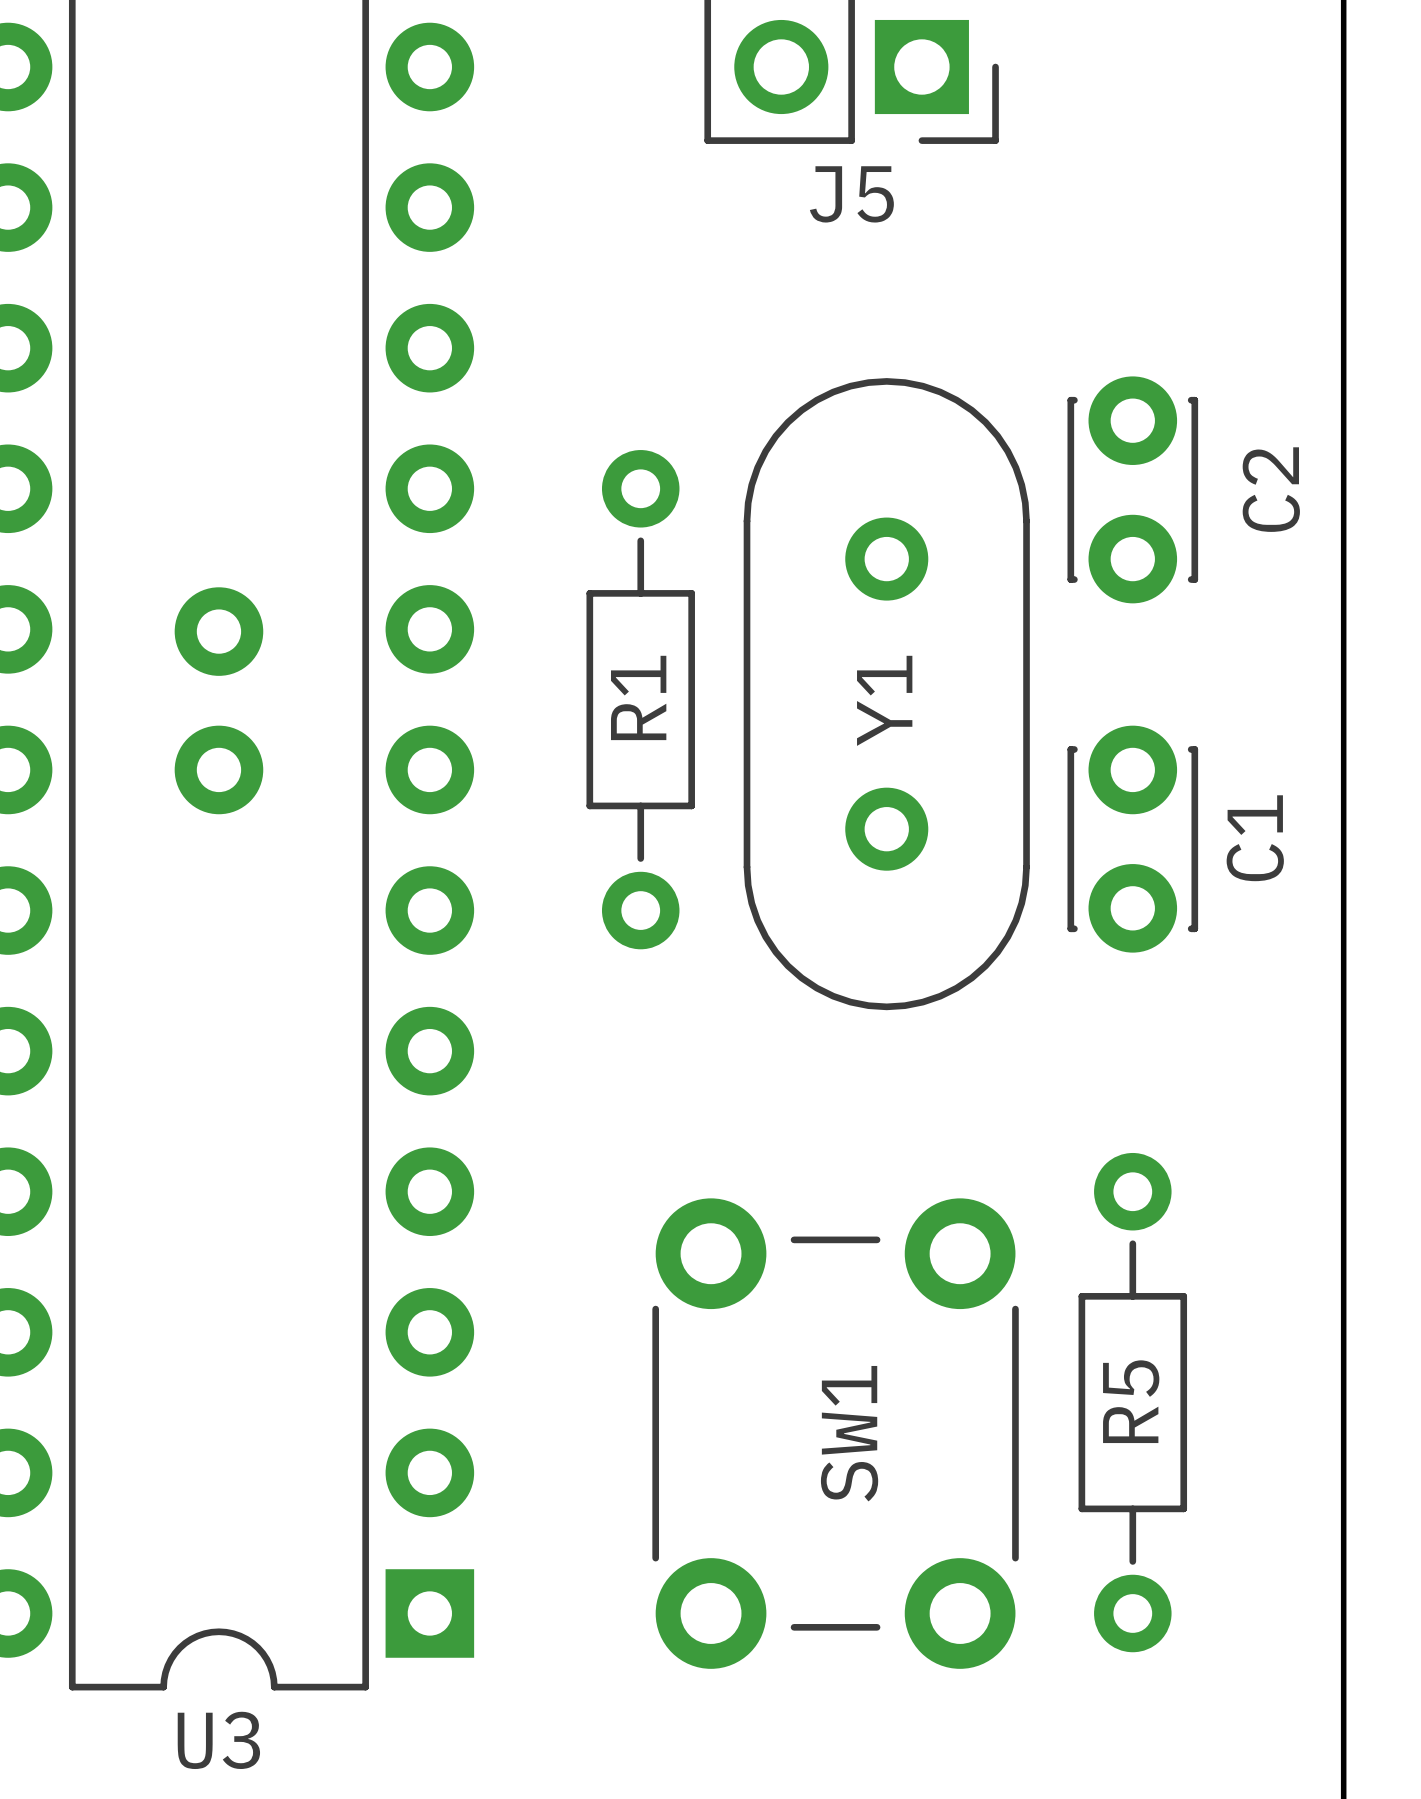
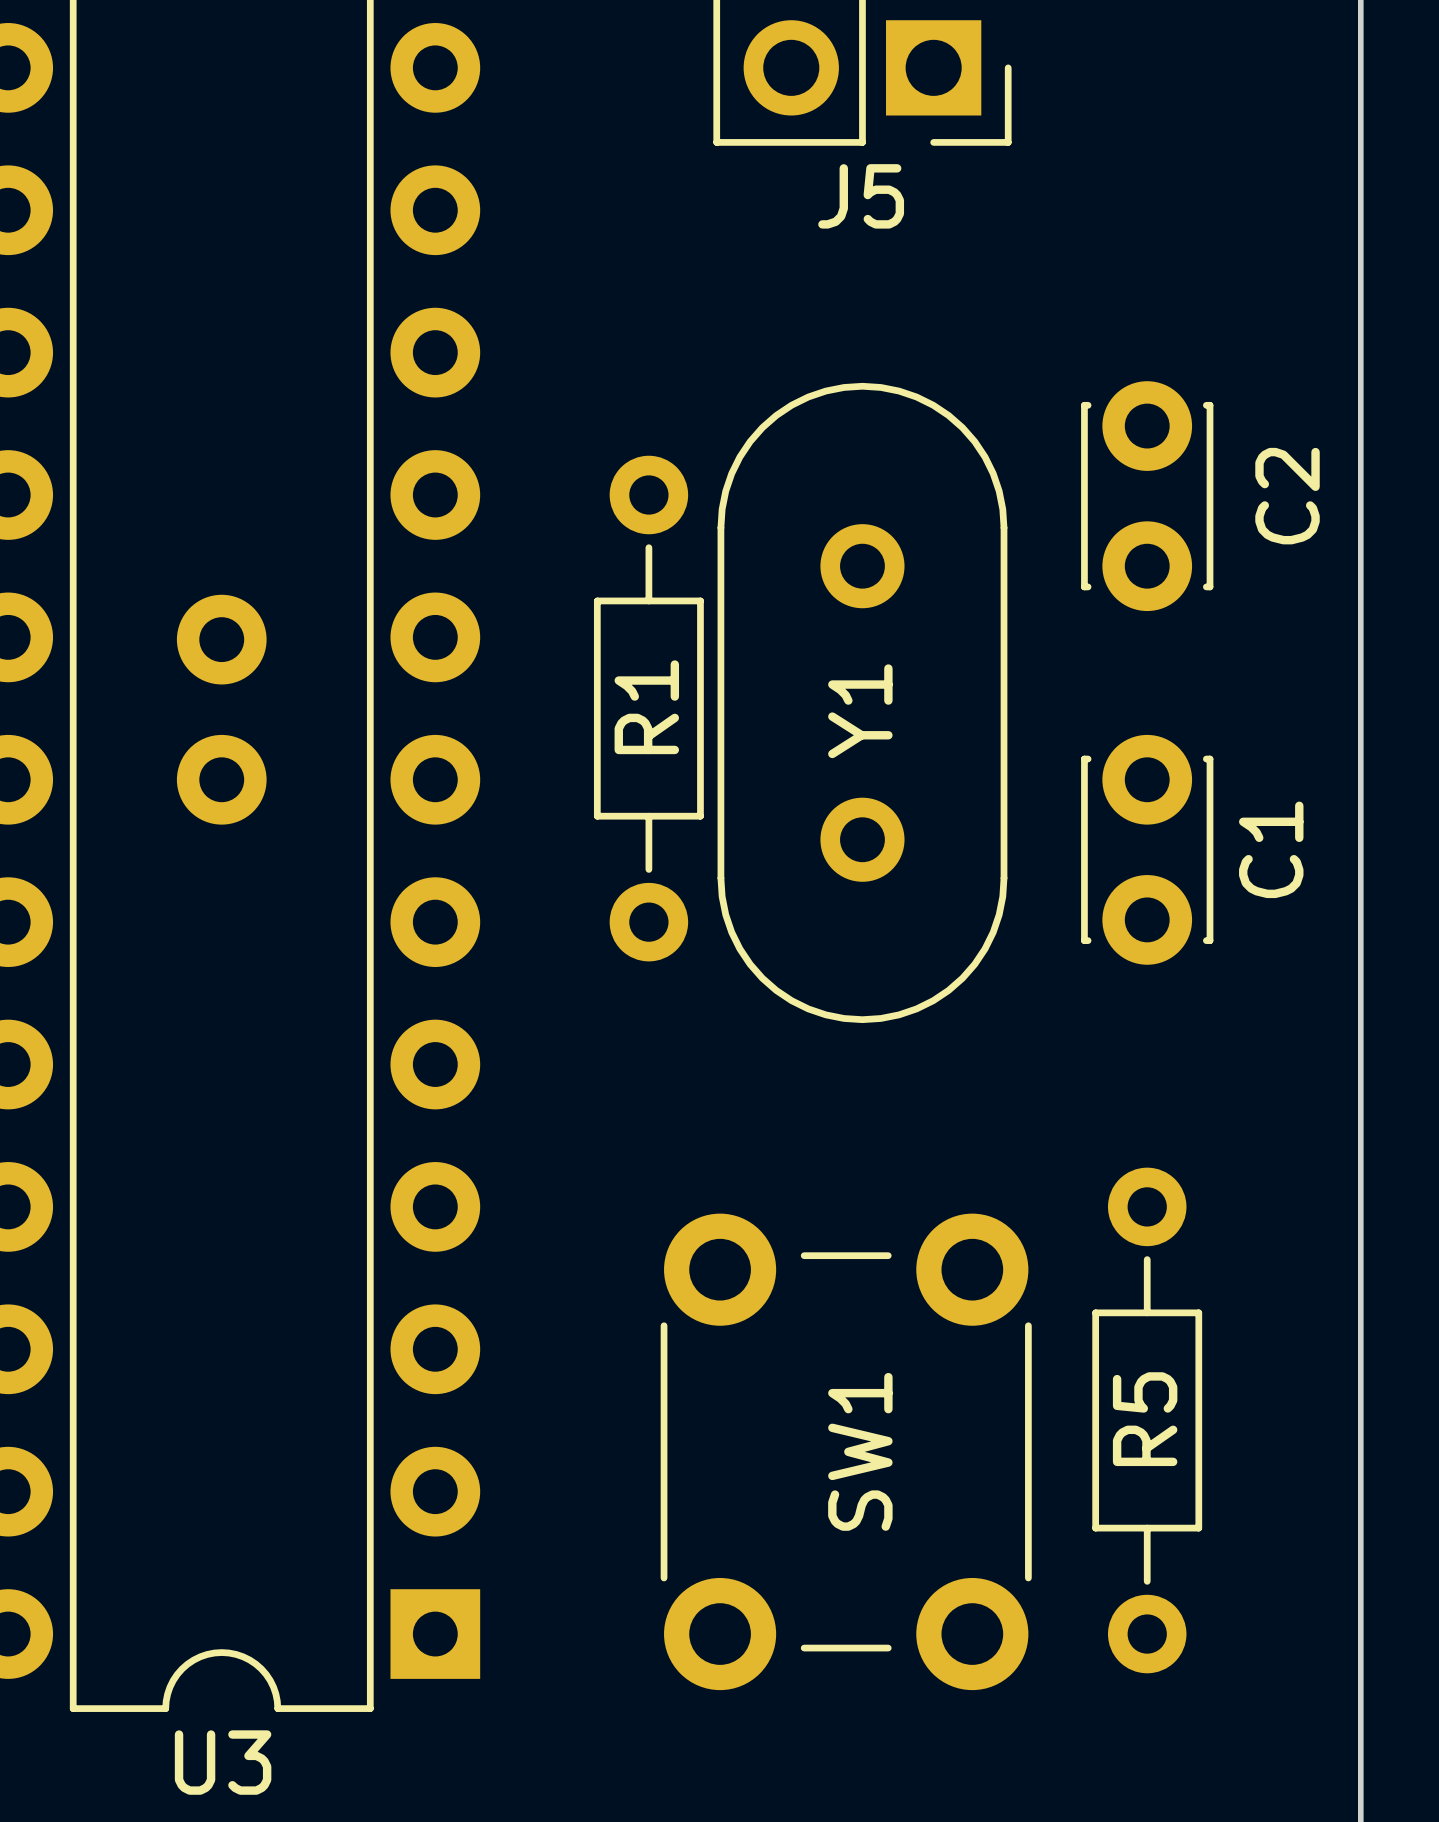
Y1 position: (886, 694) -> (862, 702)

